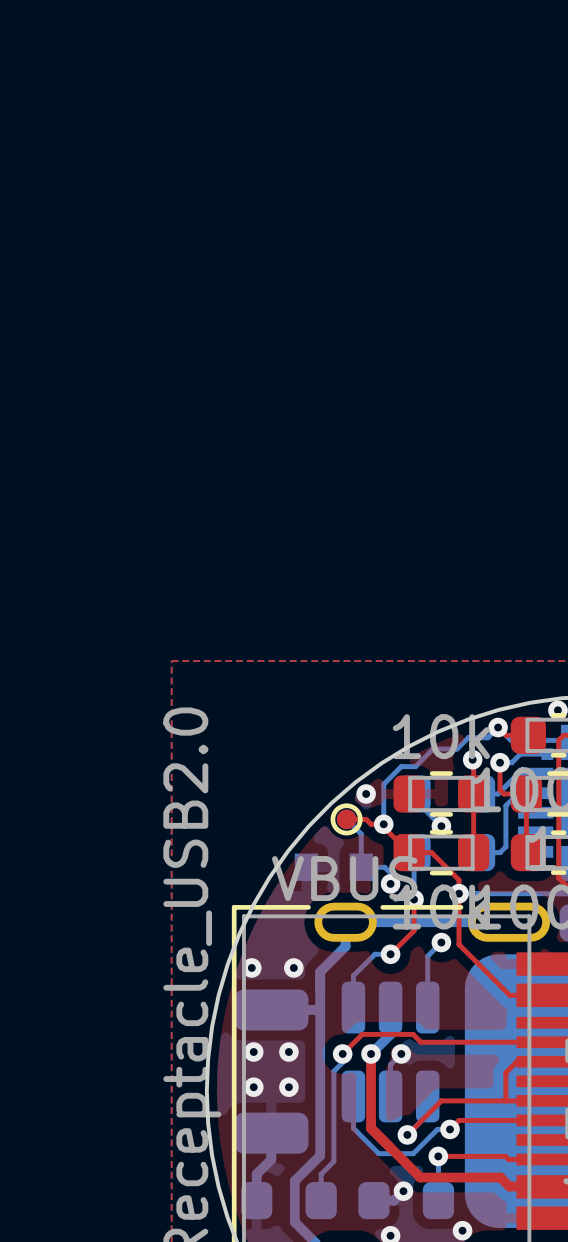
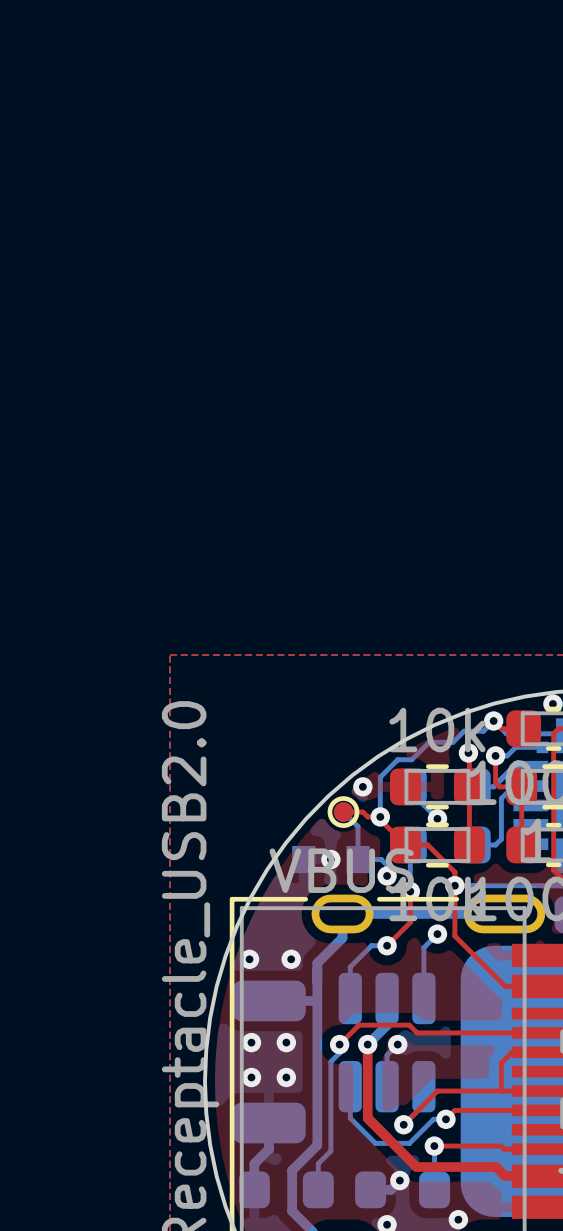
via: none -> (330, 859)

